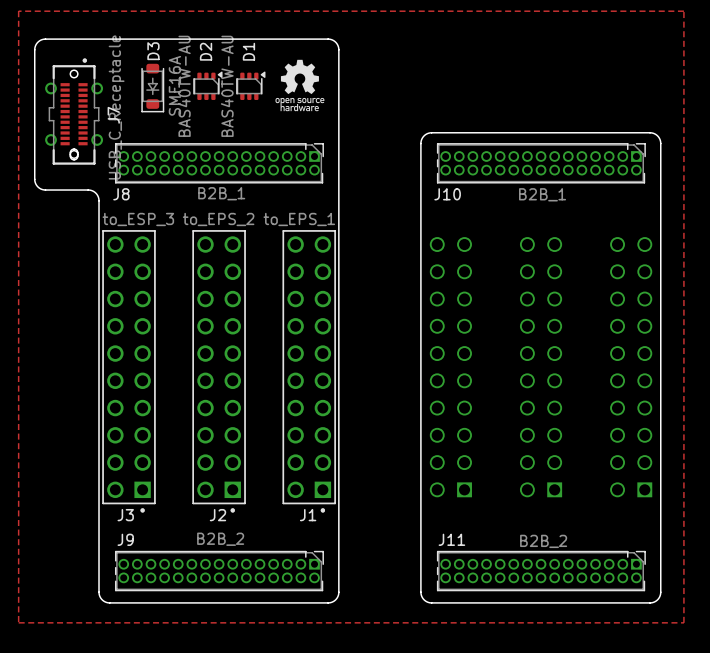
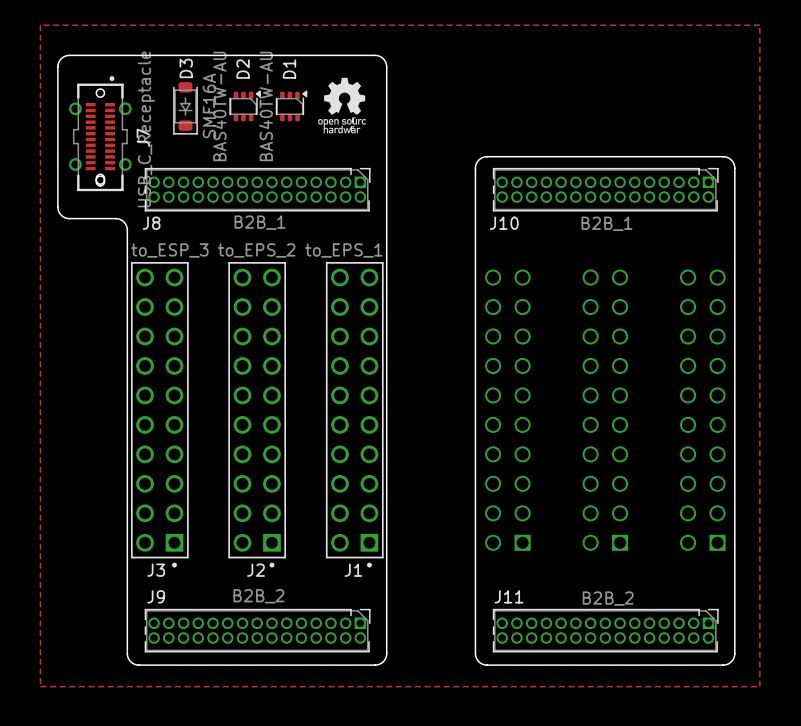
drawing: none -> [350, 117, 356, 132]
drawing: [314, 97, 325, 112] -> none

